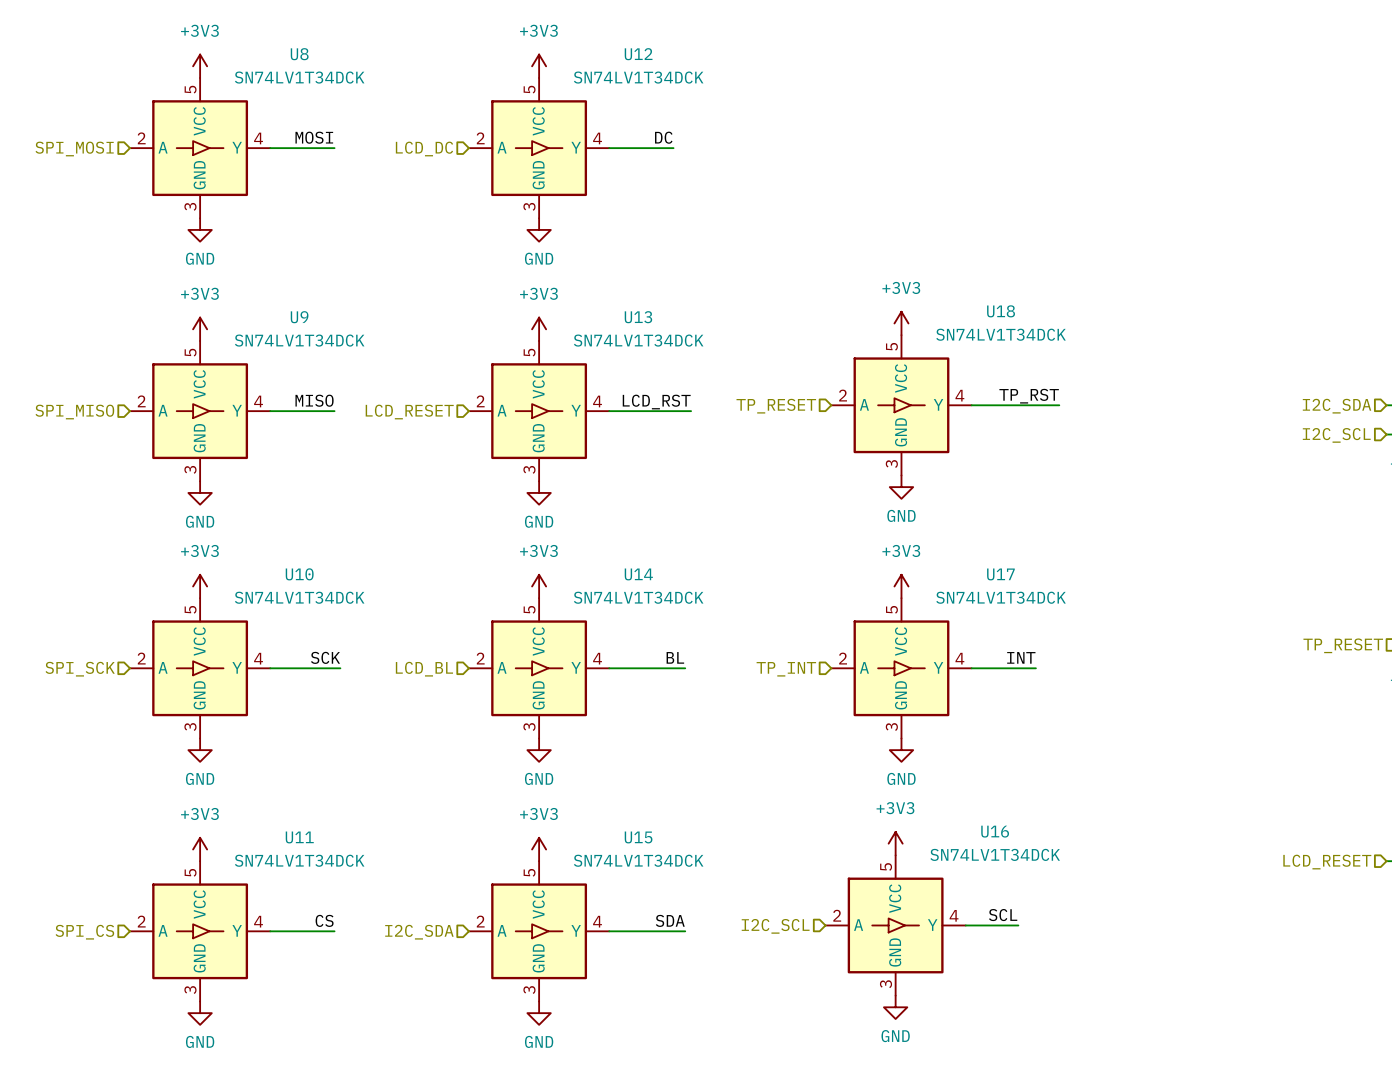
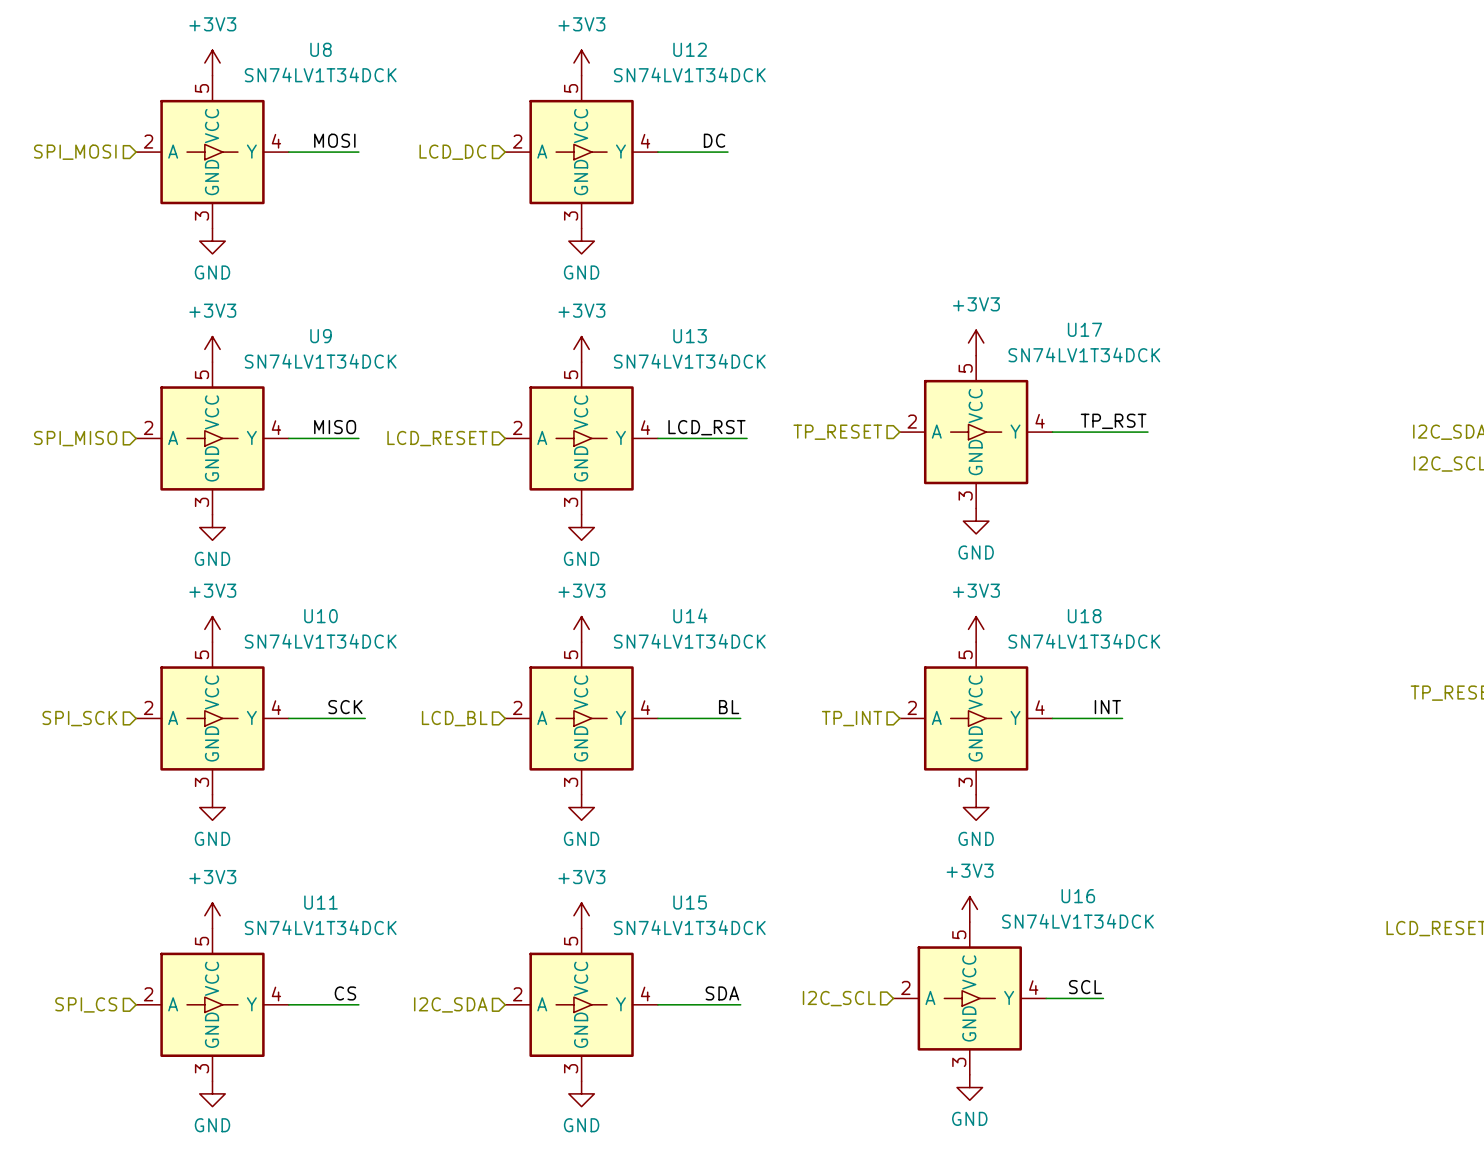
U18 name: U18 (1001, 311) -> U17 (1084, 329)
U17 name: U17 (1000, 574) -> U18 (1084, 616)

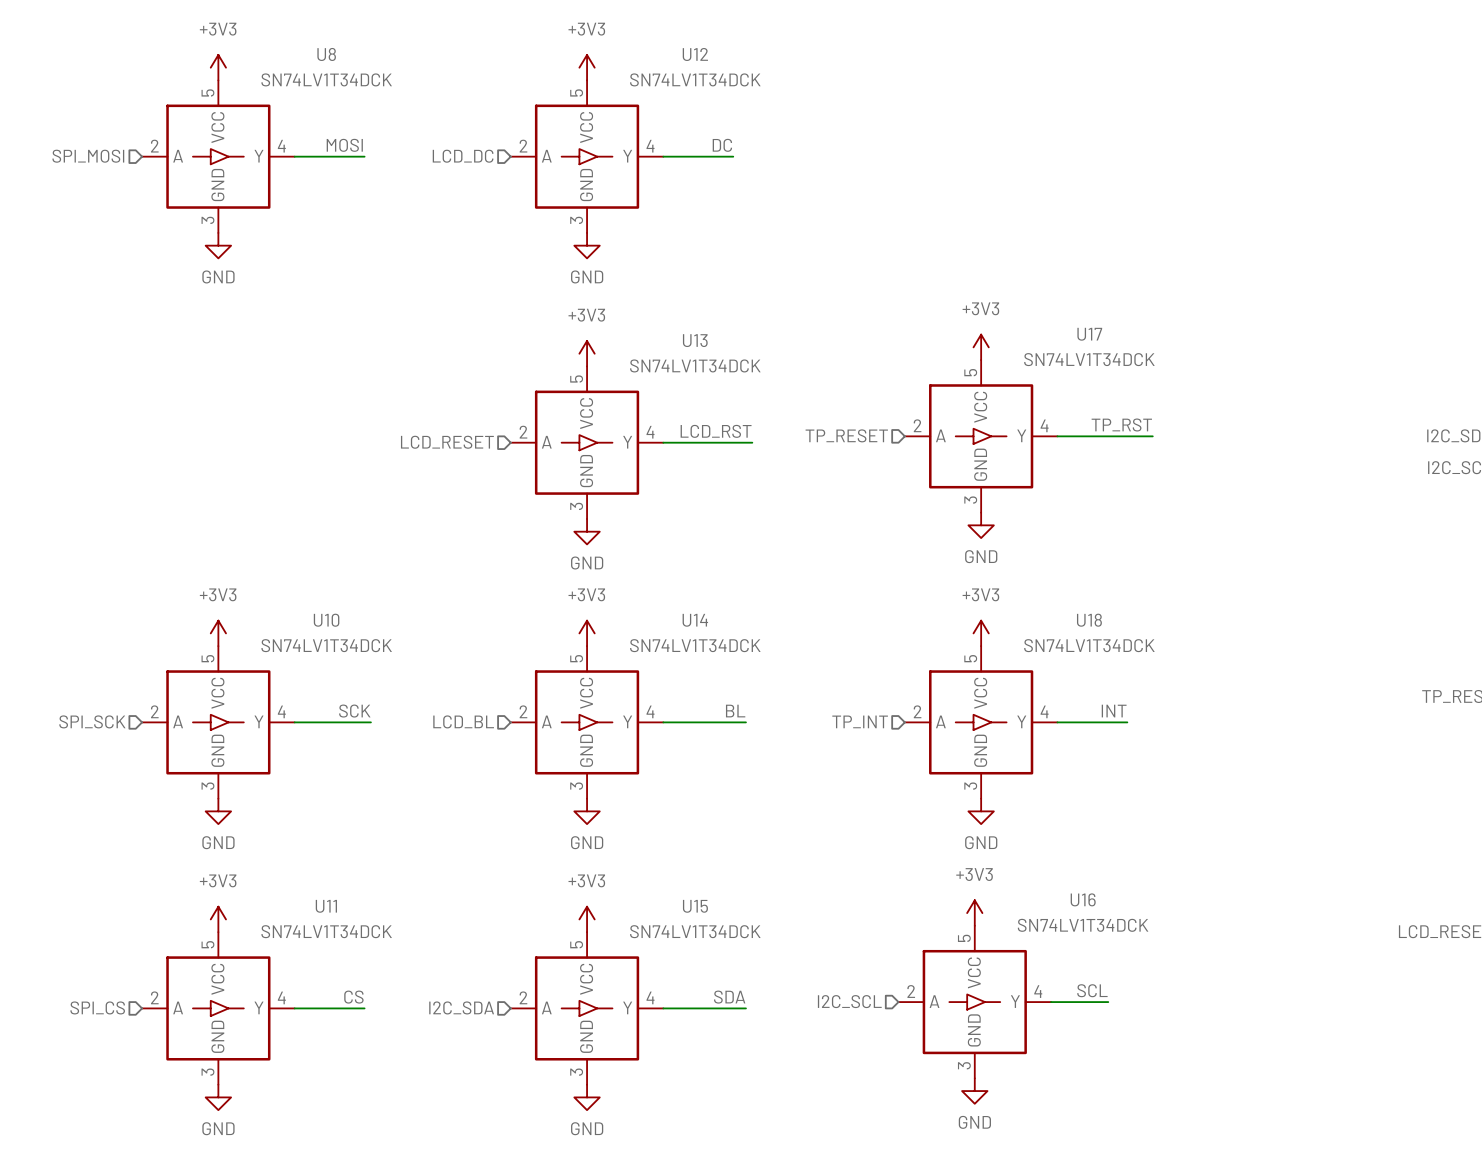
power symbol: +3V3 (212, 349) -> none
label: MISO (335, 427) -> none
hierarchical label: SPI_MISO (75, 438) -> none
U9: SN74LV1T34DCK (212, 438) -> none
wire: (288, 438) (358, 438) -> none
power symbol: GND (212, 527) -> none

